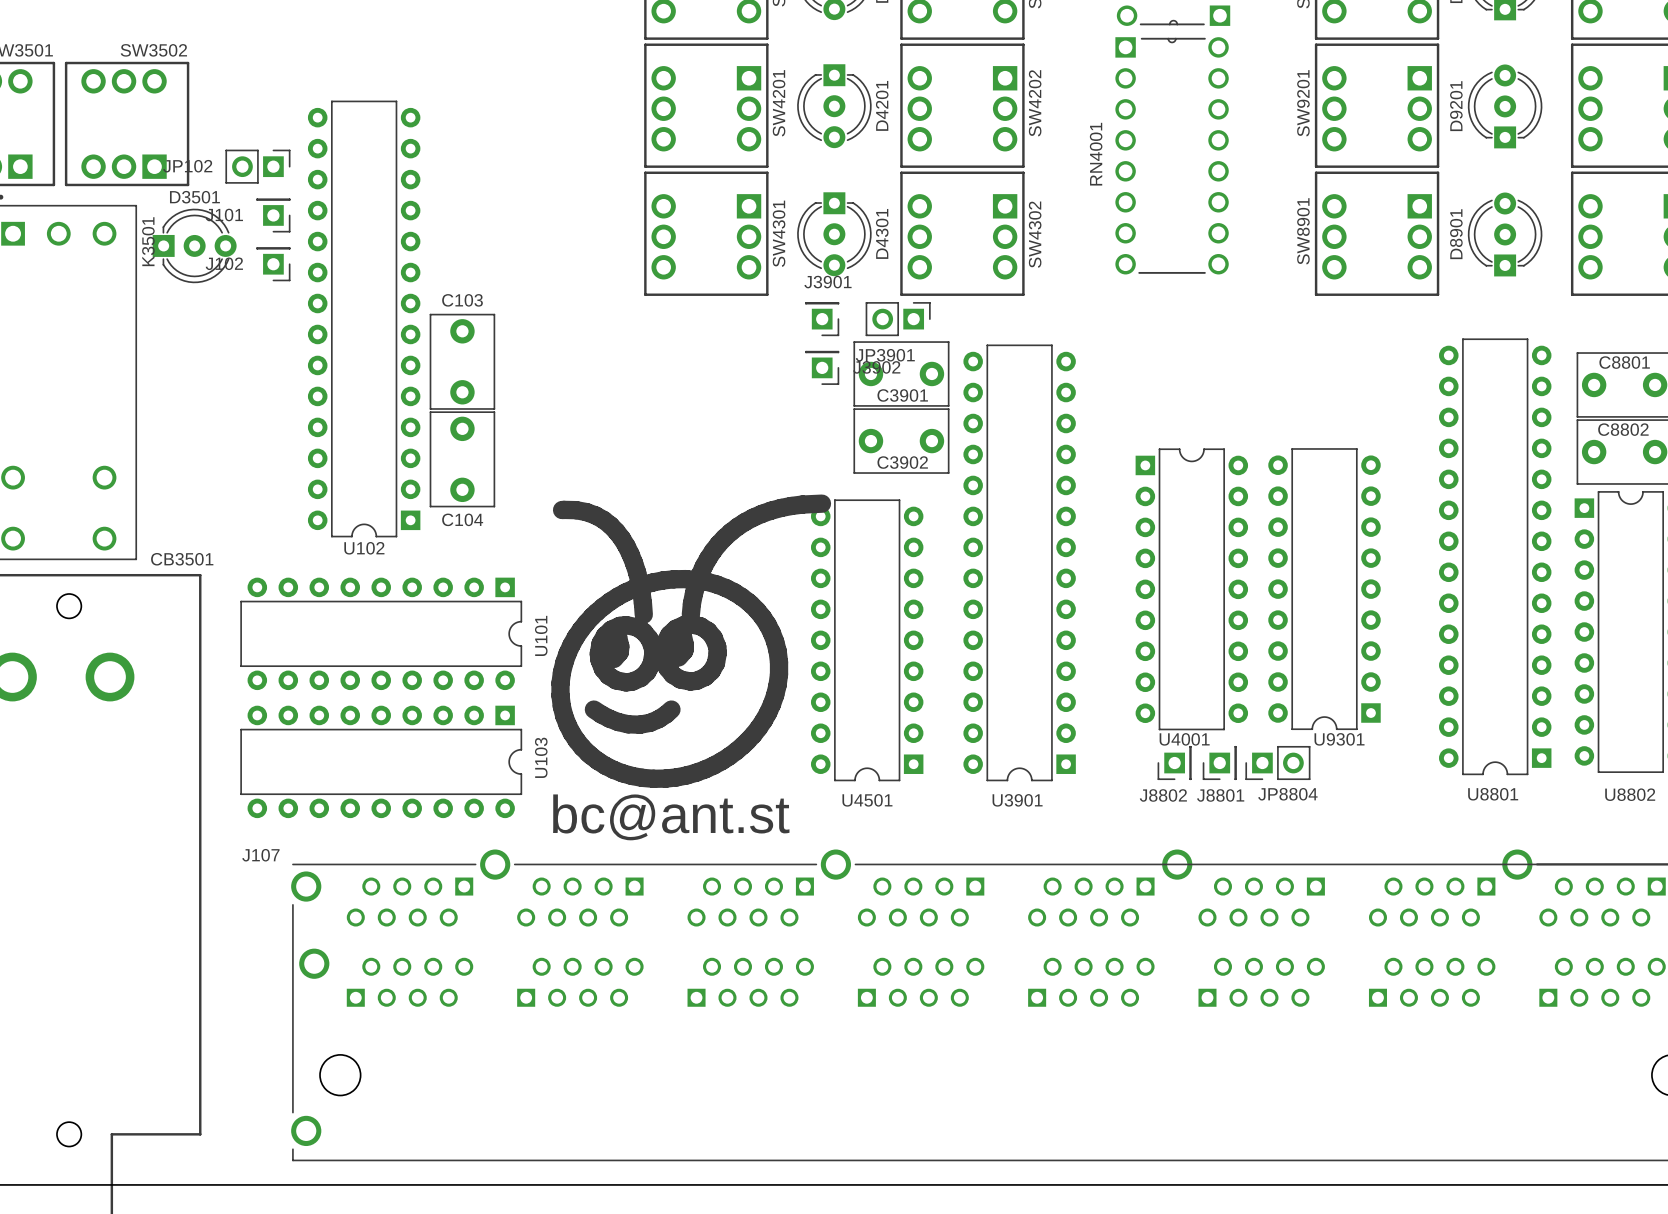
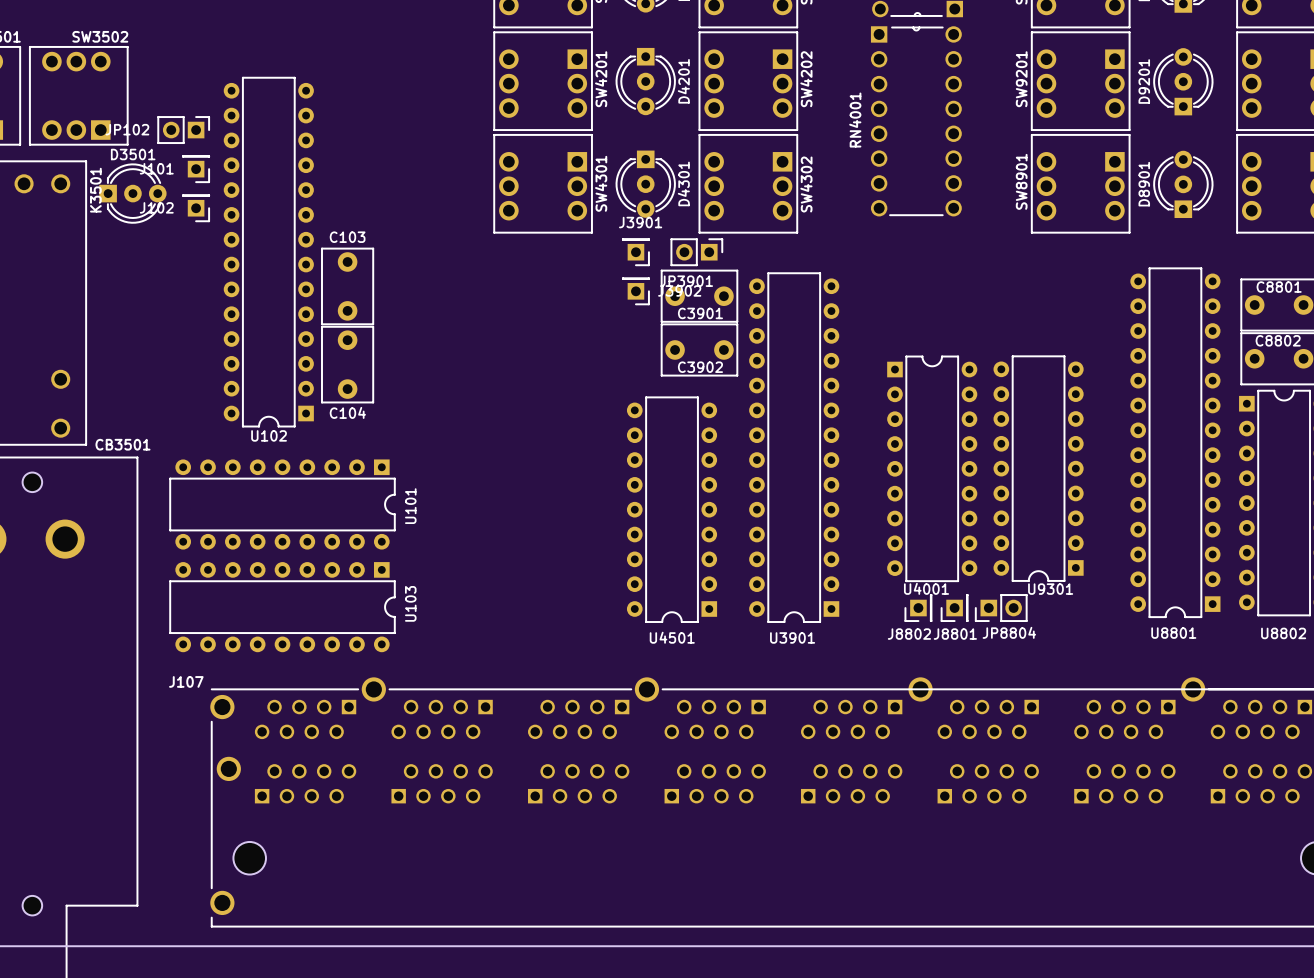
drawing: [551, 494, 832, 788] -> none
text: bc@ant.st (671, 817) -> none

